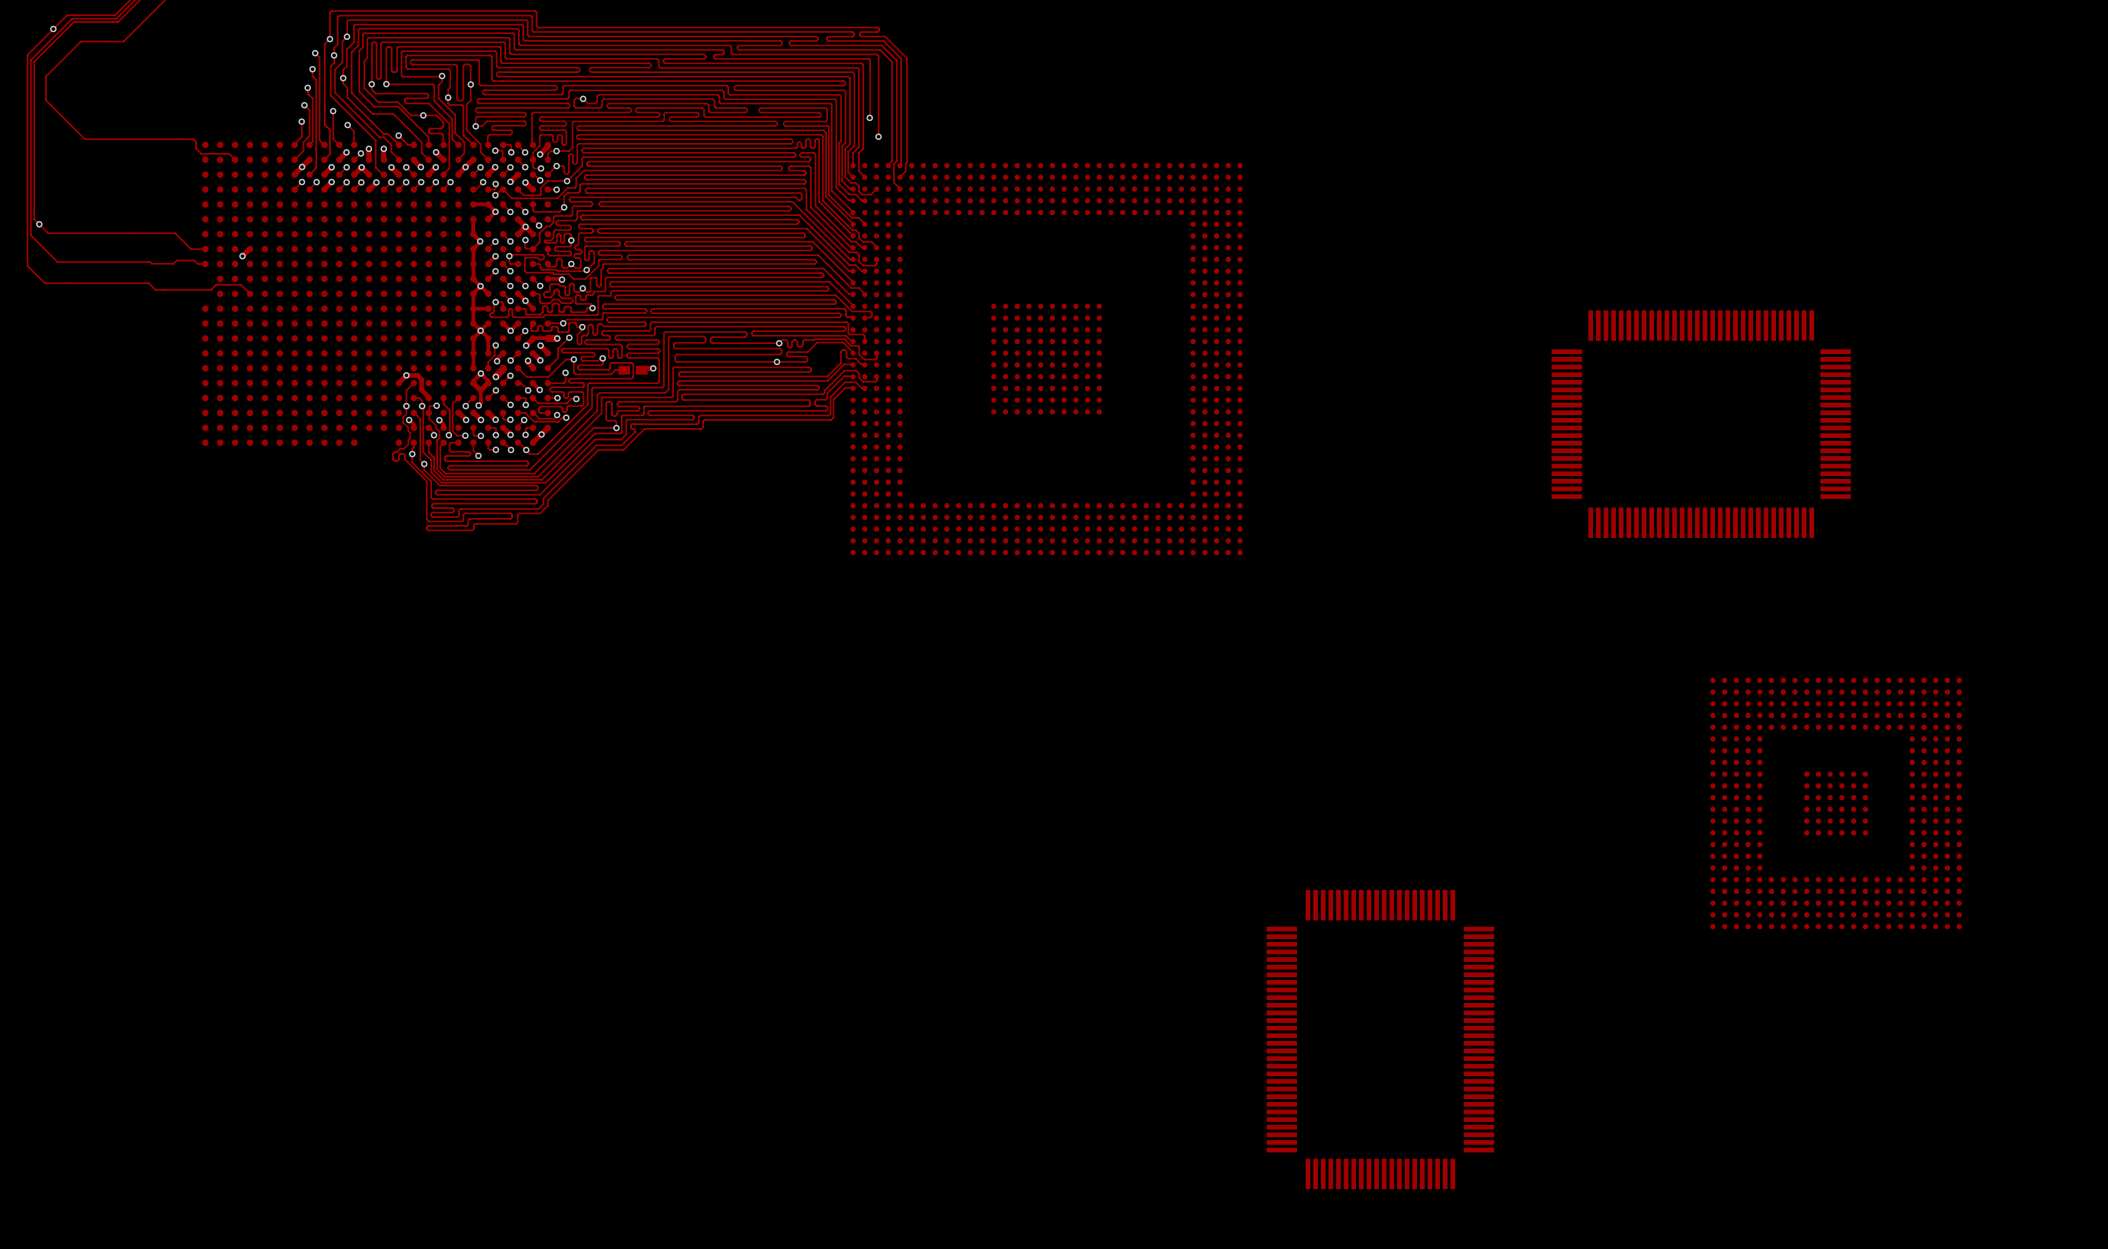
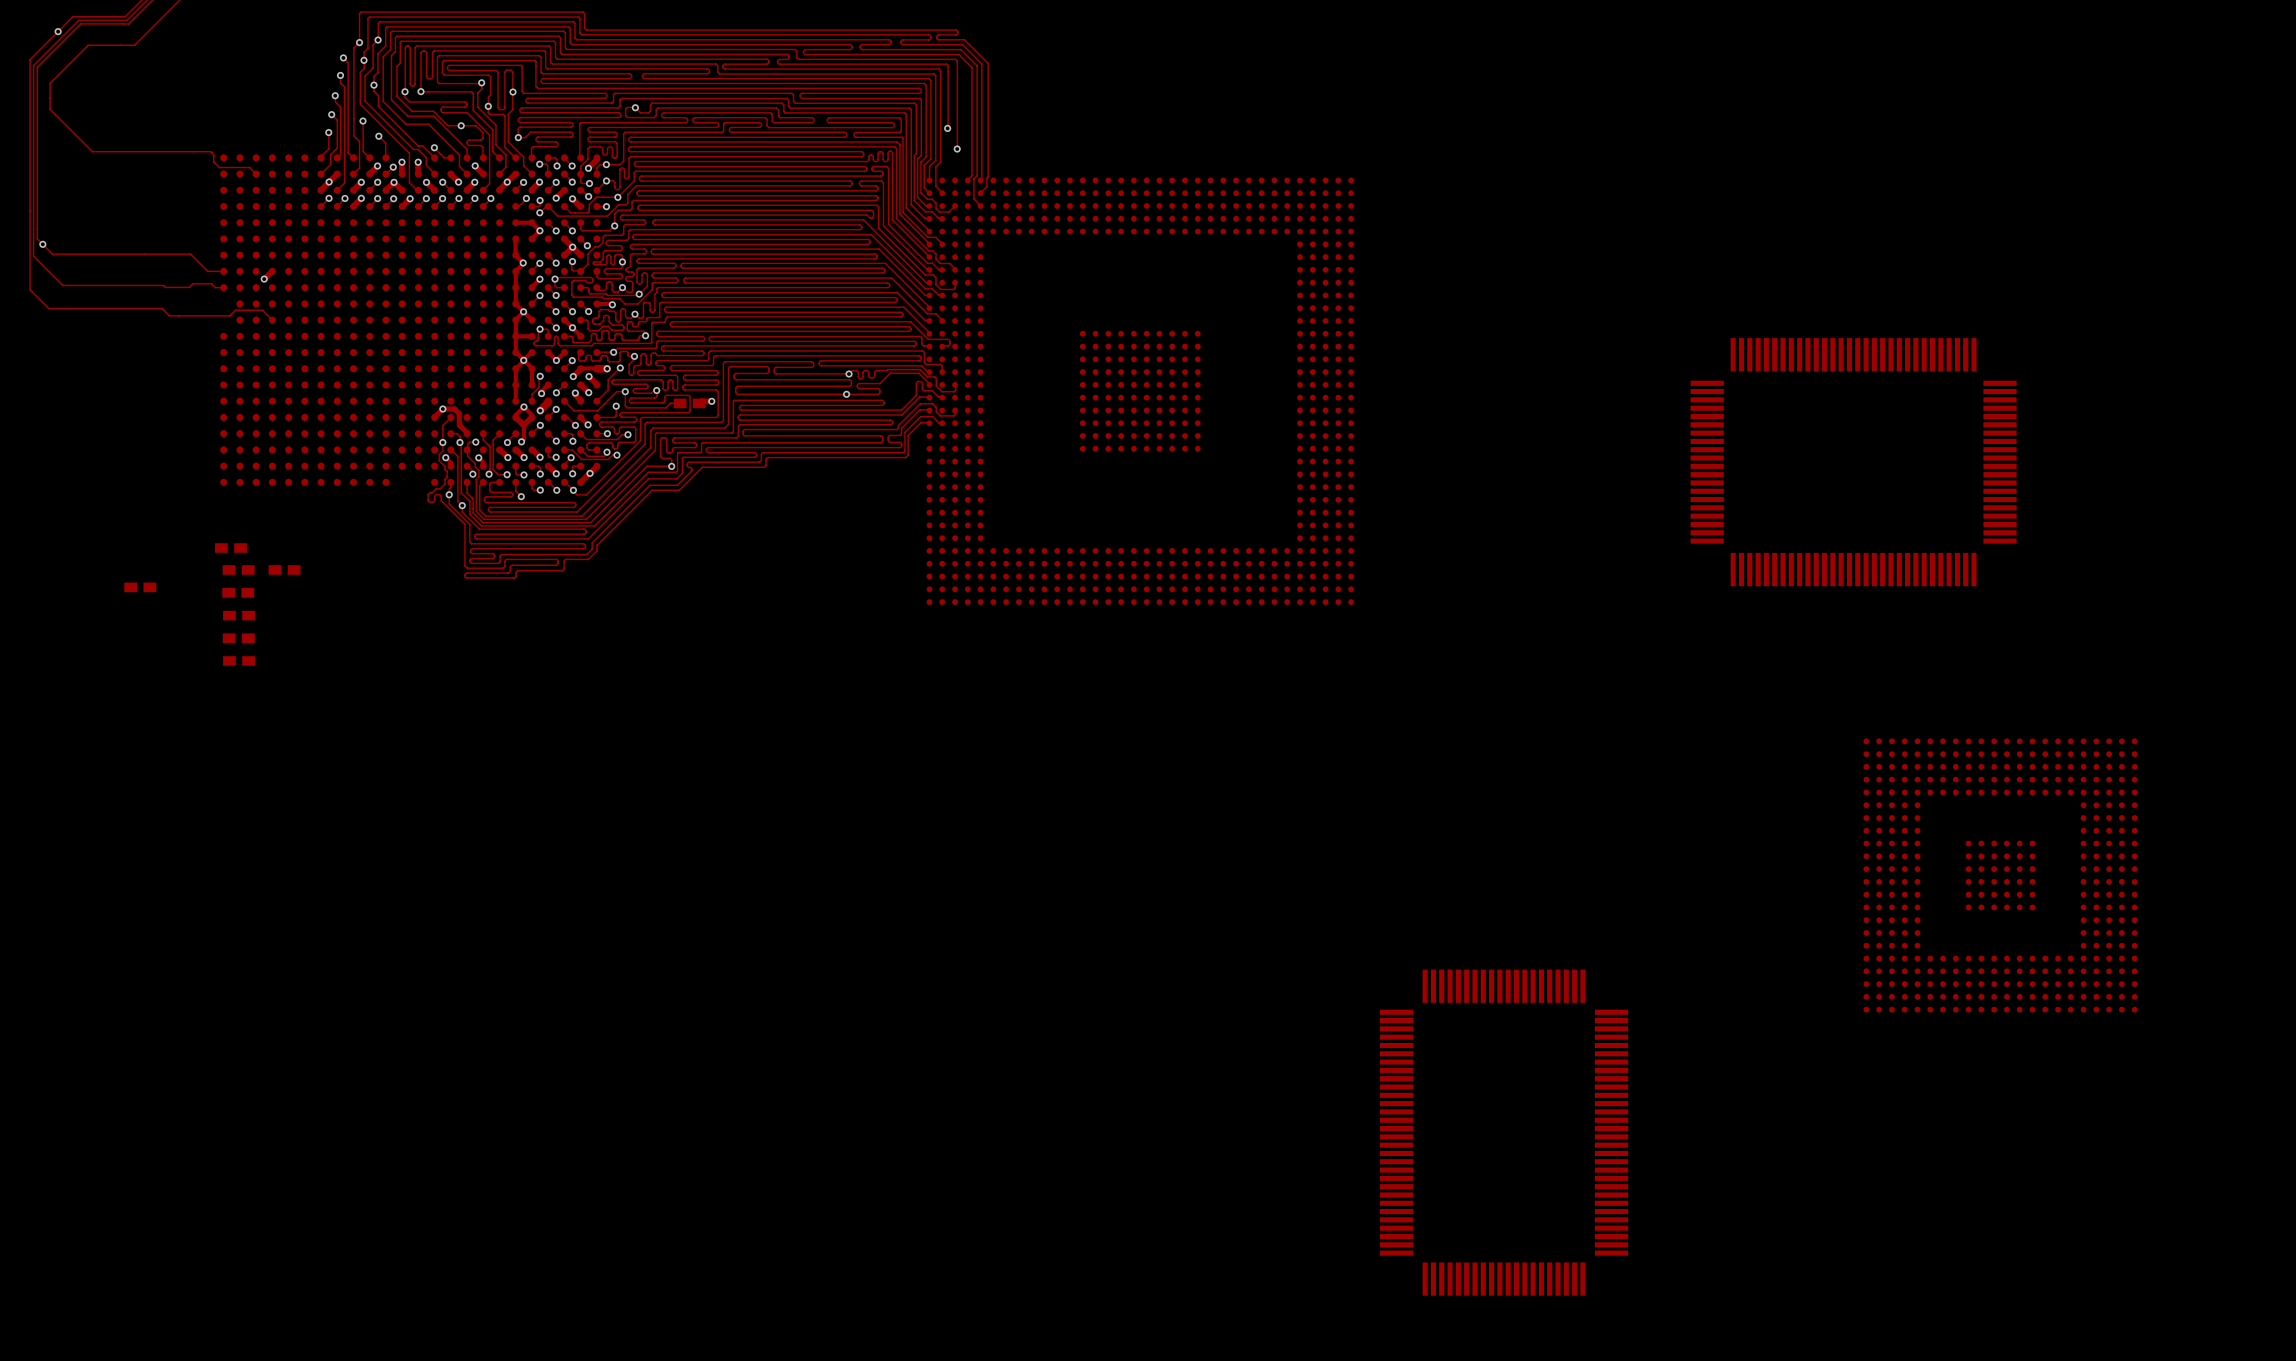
part: none -> (231, 548)
part: none -> (238, 570)
part: none -> (284, 570)
part: none -> (140, 587)
part: none -> (238, 592)
part: none -> (239, 615)
part: none -> (238, 638)
part: none -> (239, 660)

